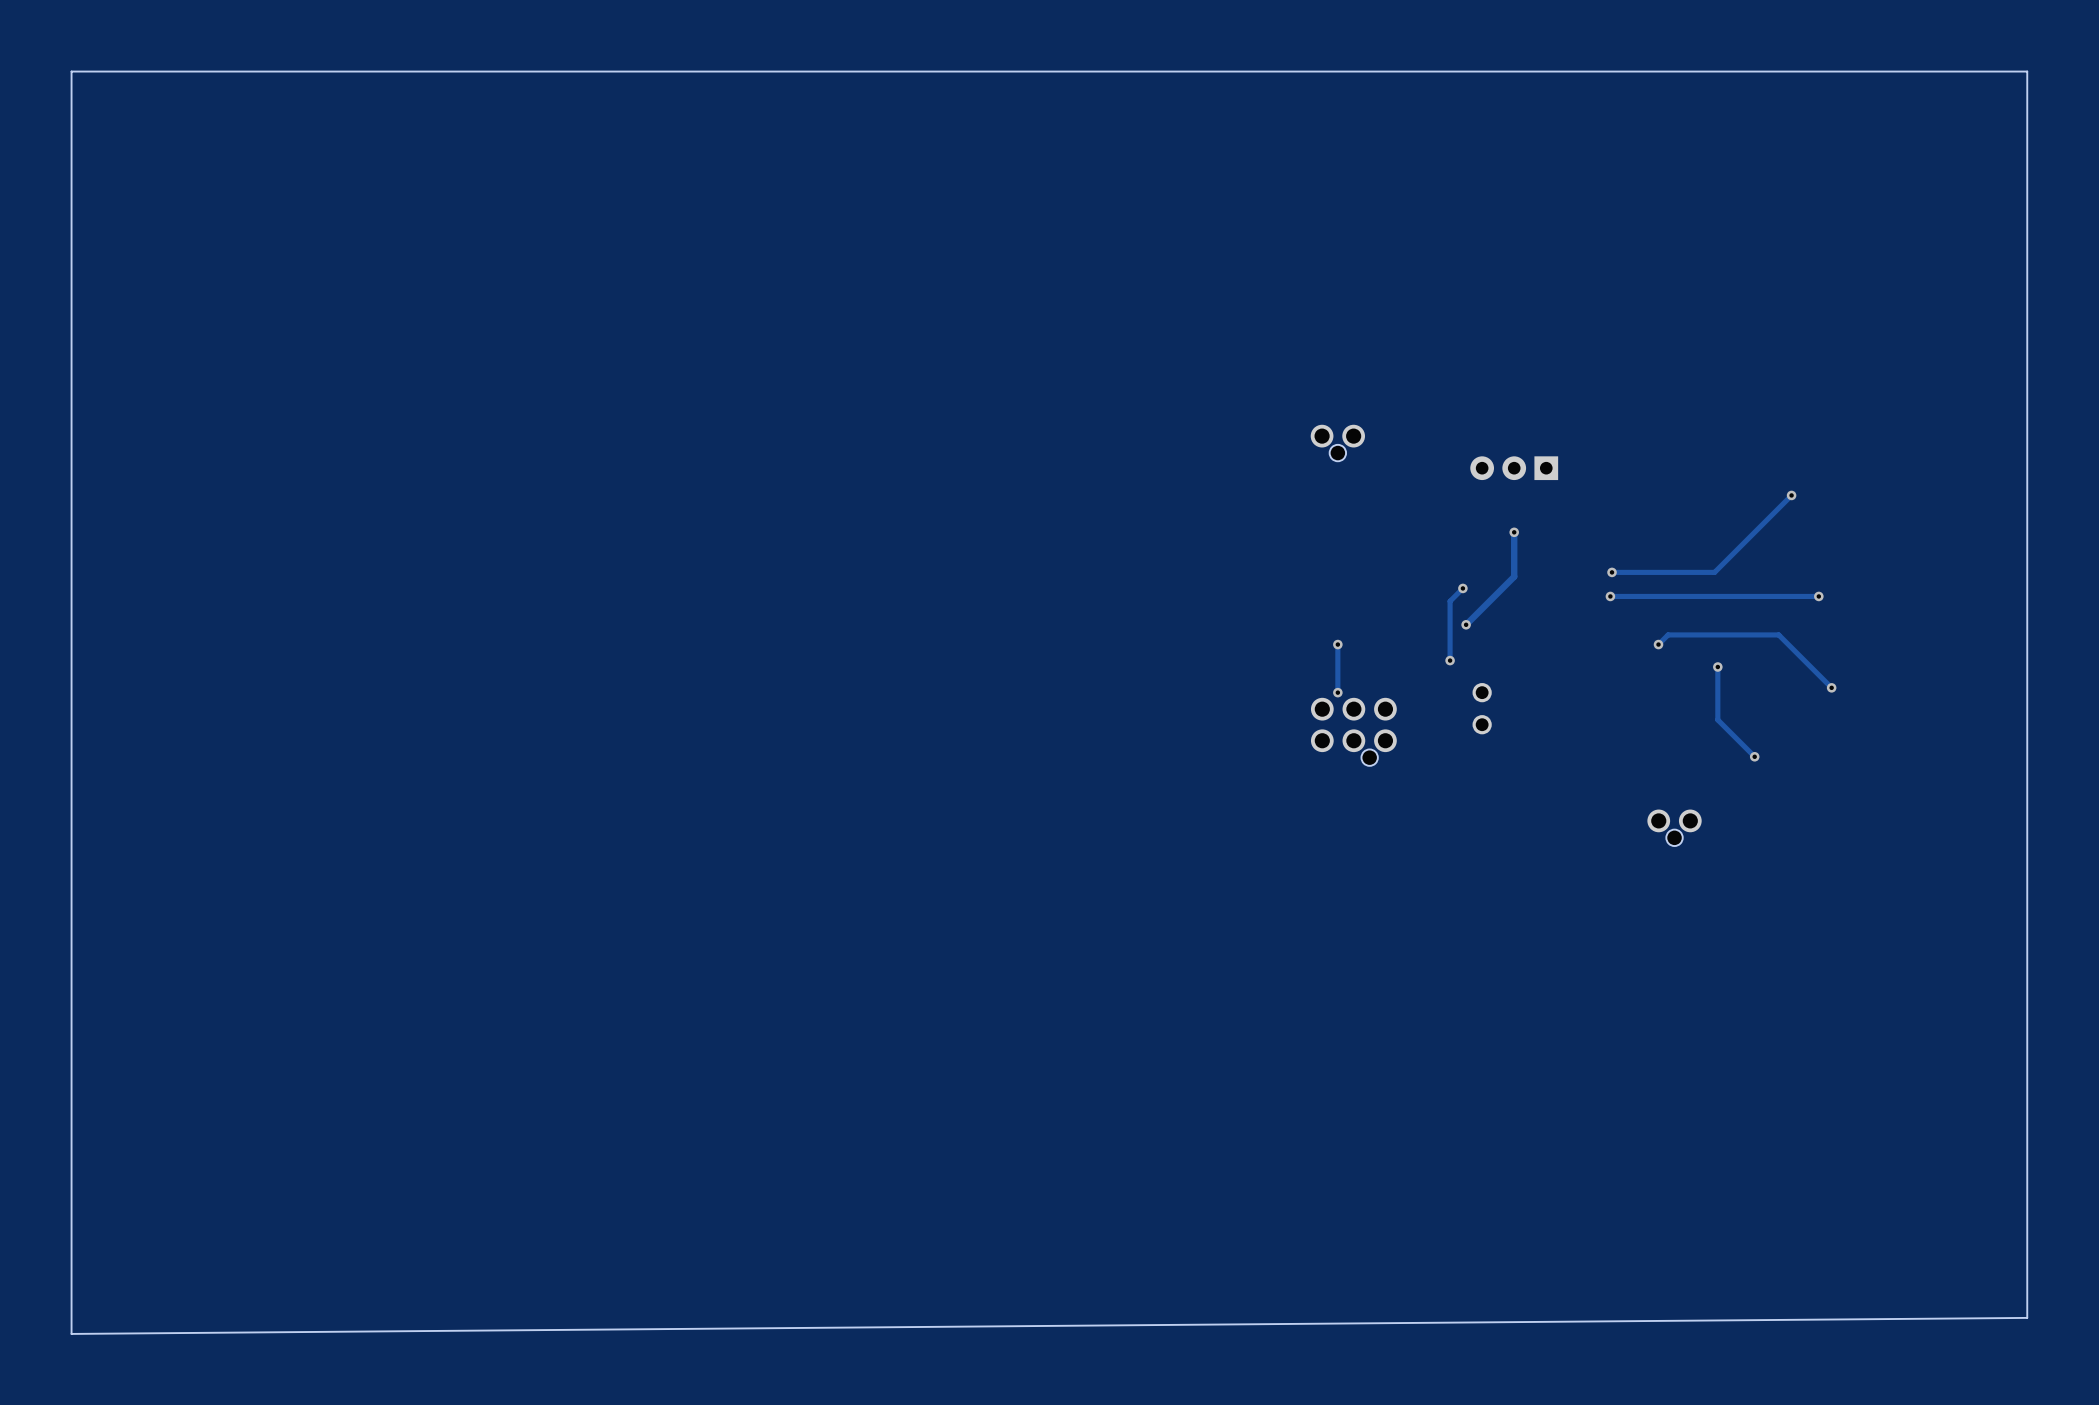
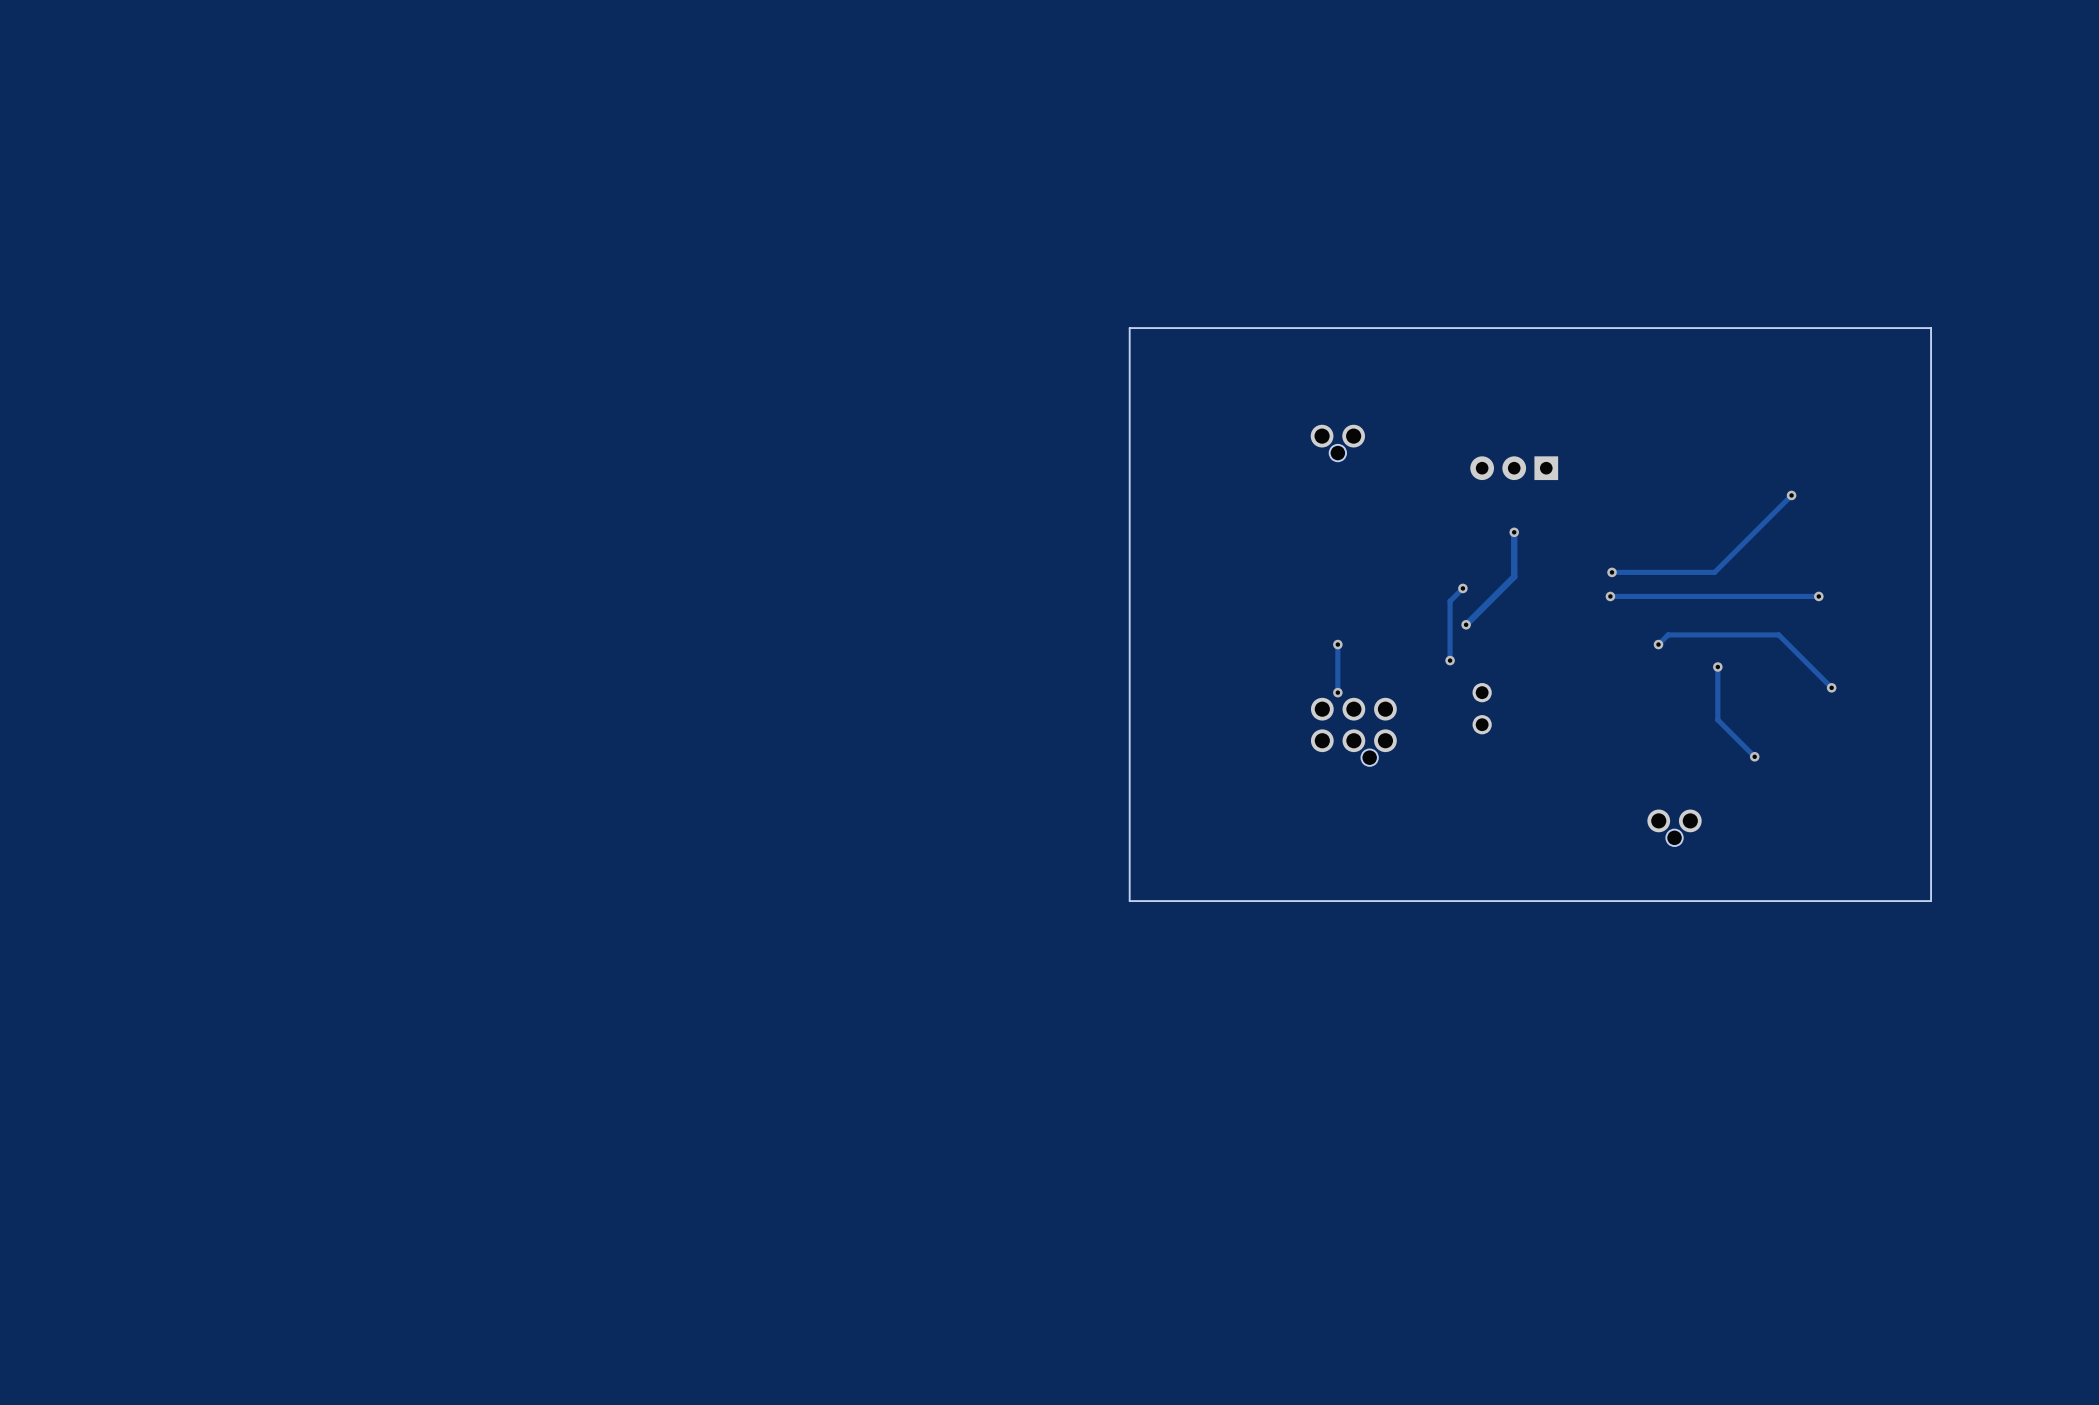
board edge: (2027, 71) (71, 71) (71, 1333) (2027, 1317) (2027, 71) -> none
board edge: none -> (1931, 328) (1129, 328) (1129, 901) (1931, 901) (1931, 328)

